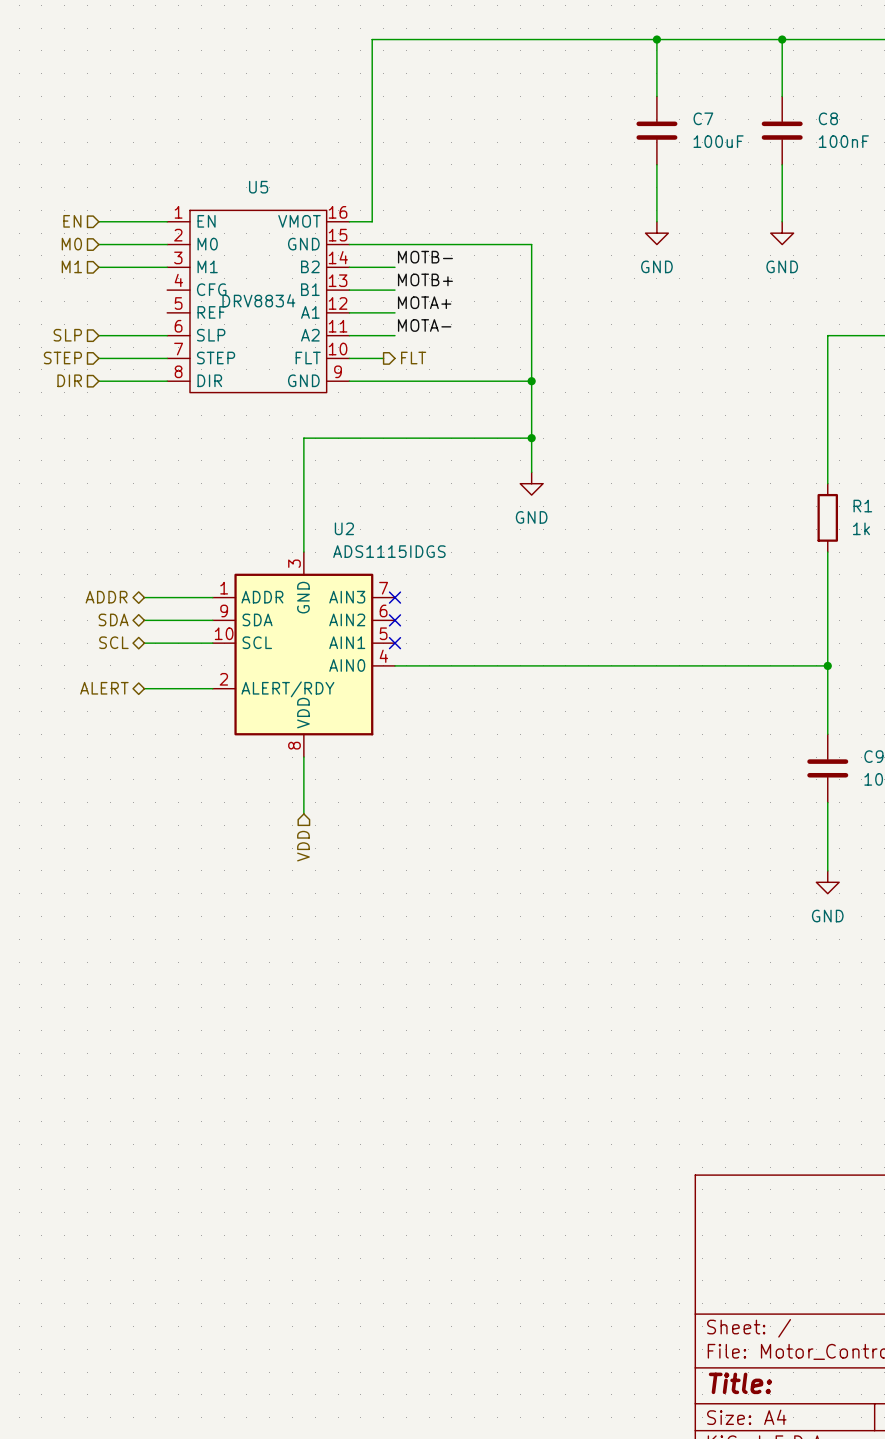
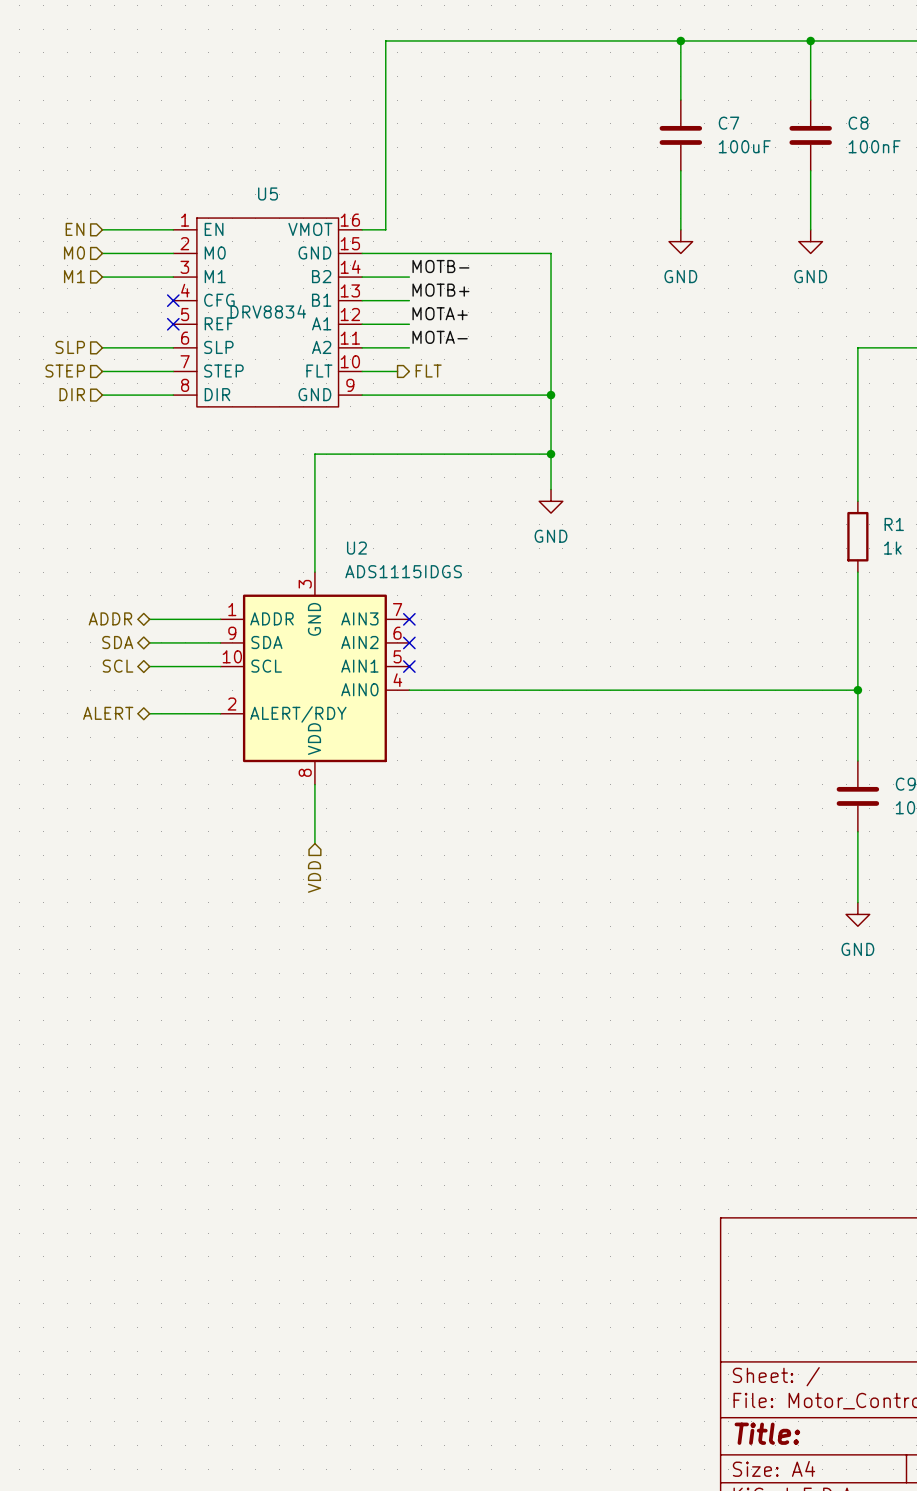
no-connect mark: none -> (173, 300)
no-connect mark: none -> (173, 324)

